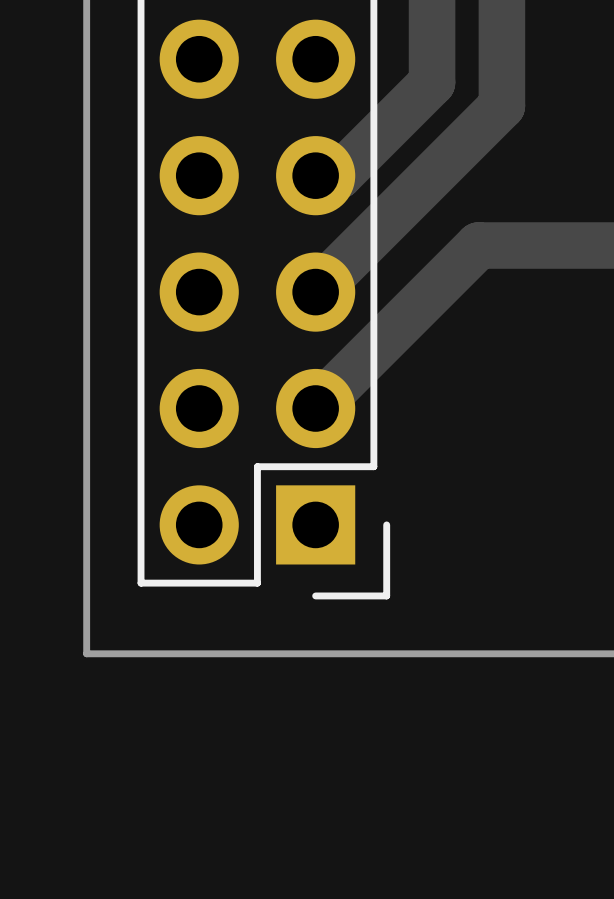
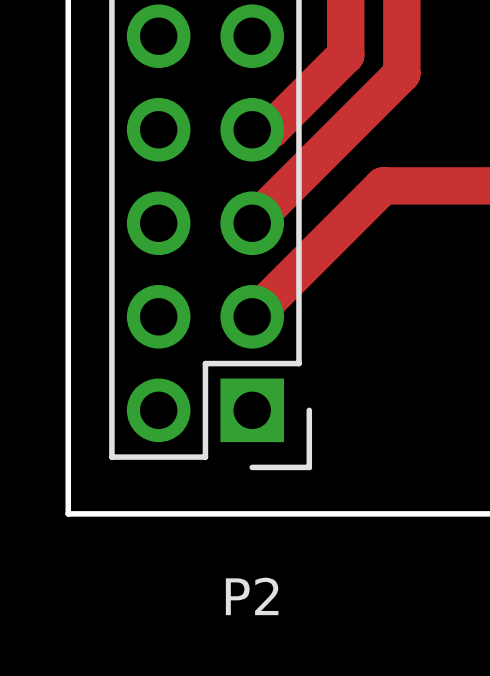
P2 name: none -> P2 (252, 596)

